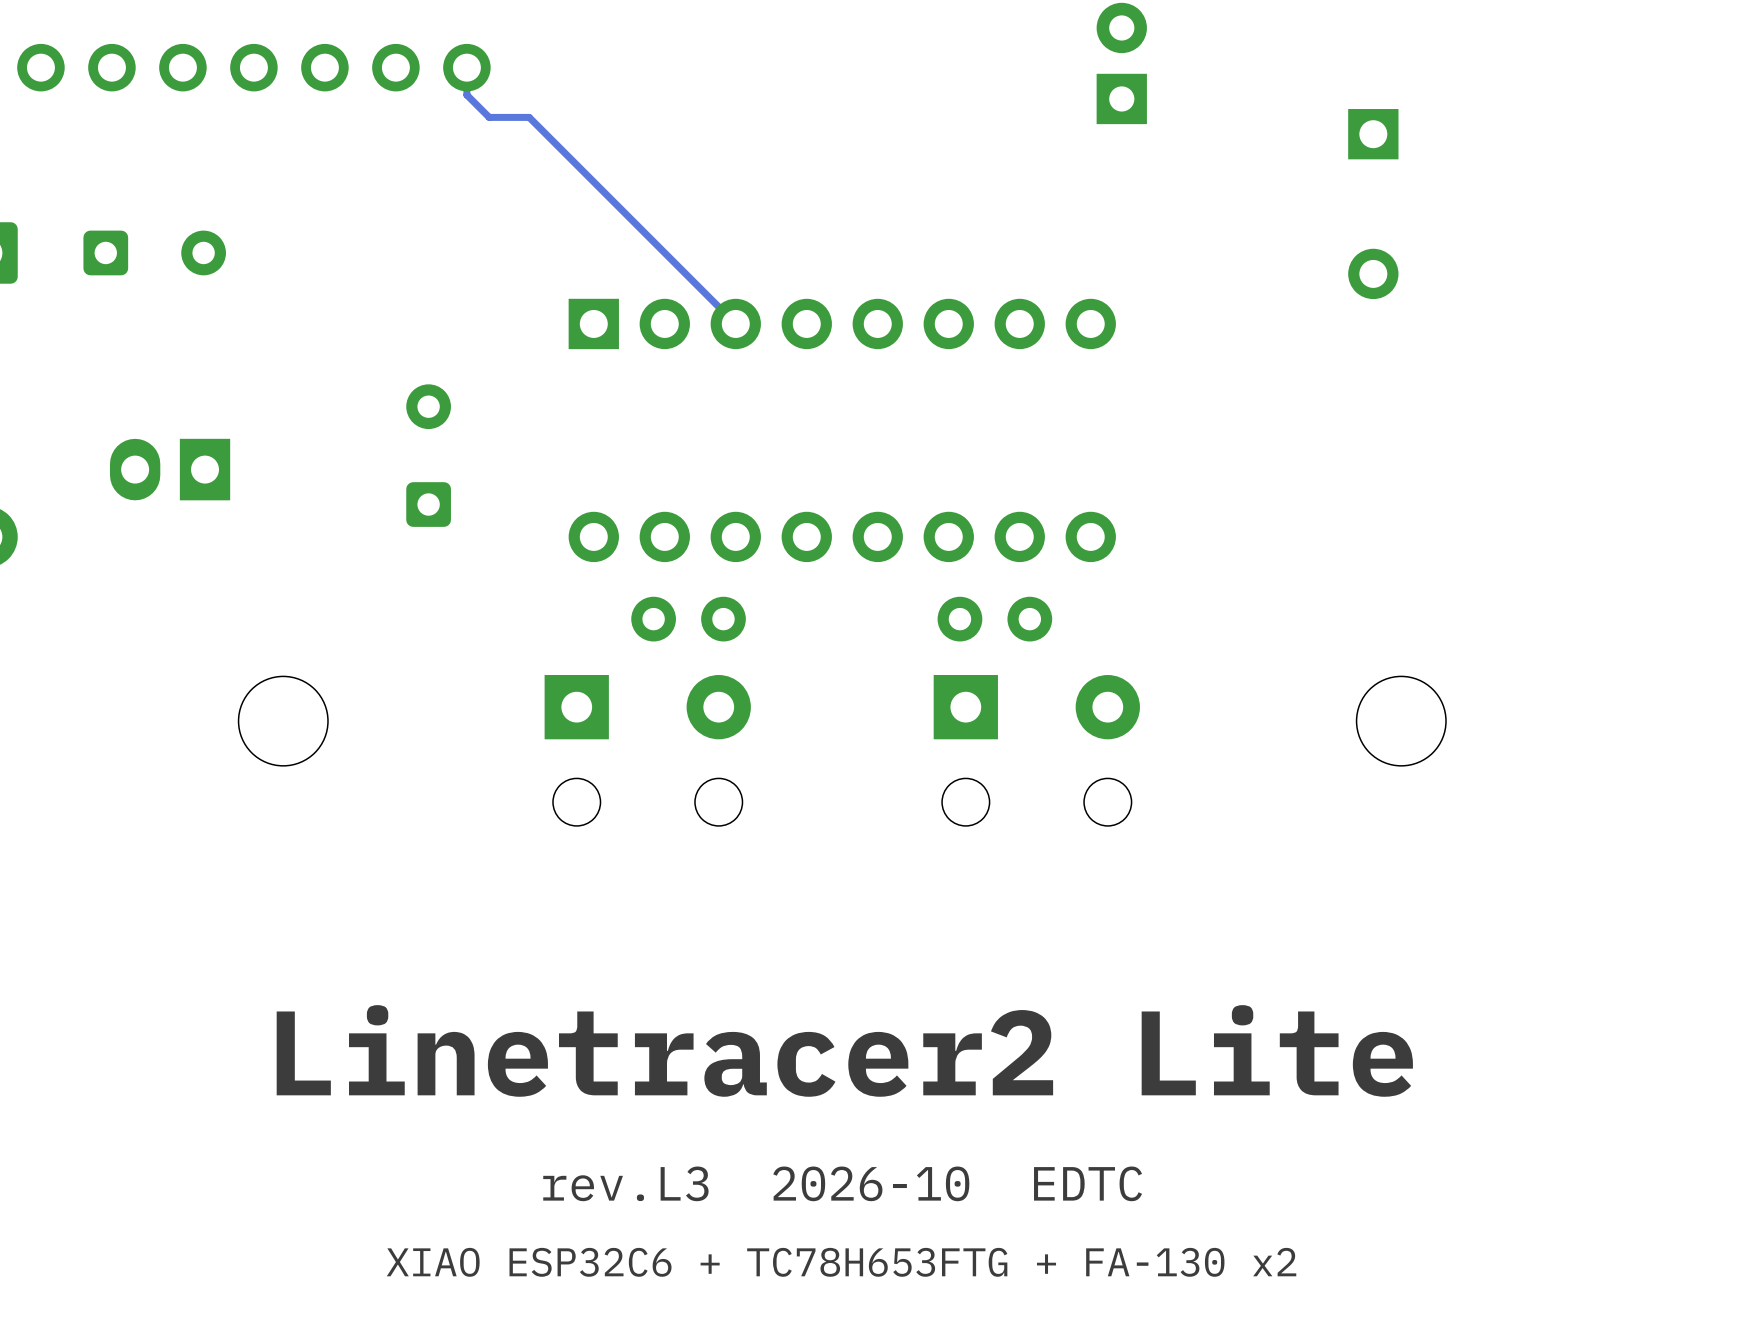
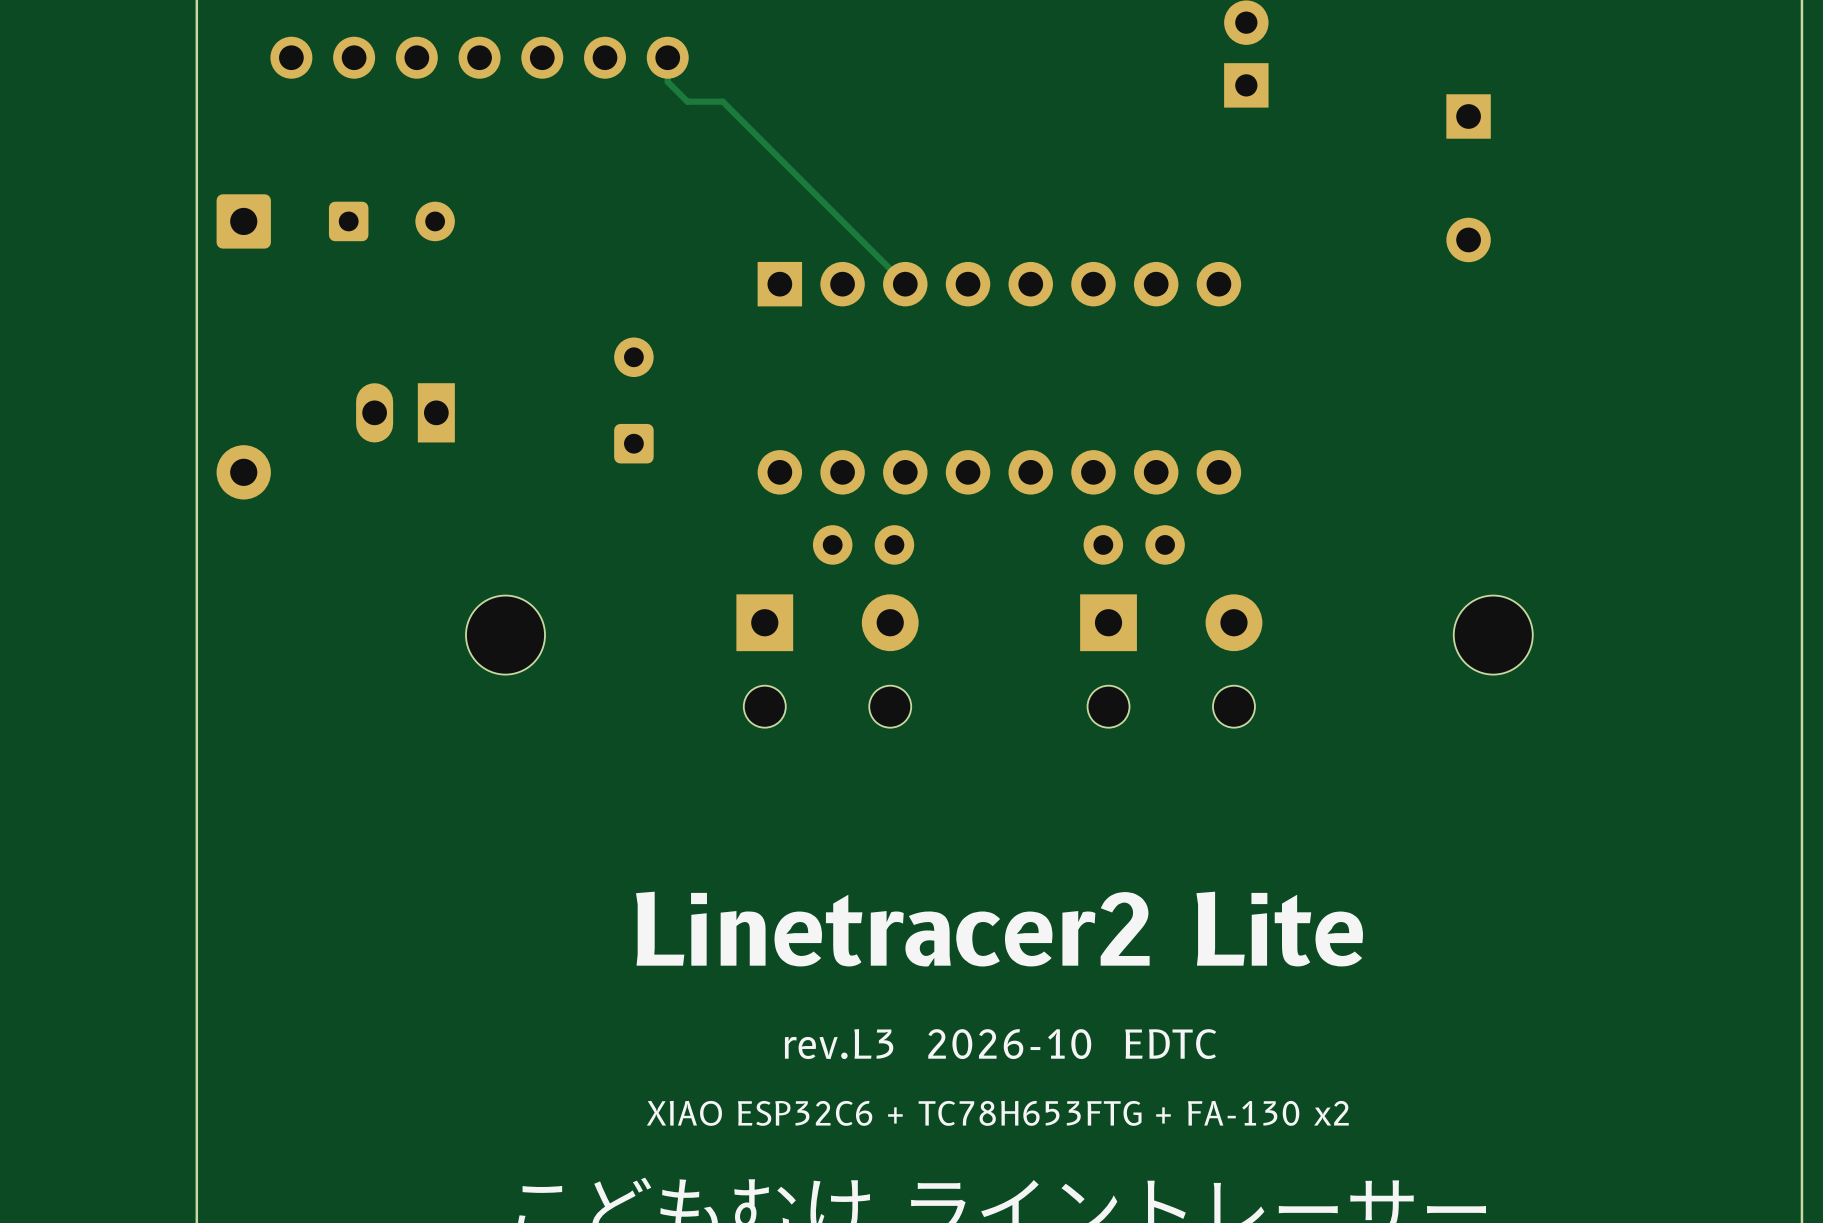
part footprint: [109, 438, 231, 501] -> [356, 383, 455, 443]

